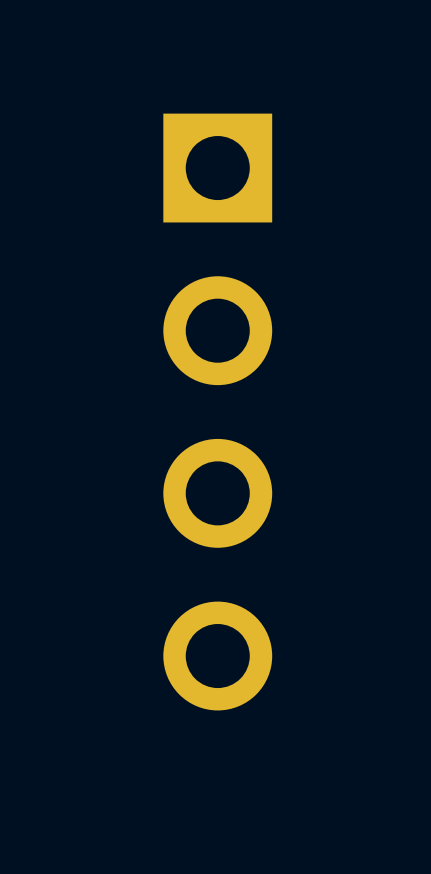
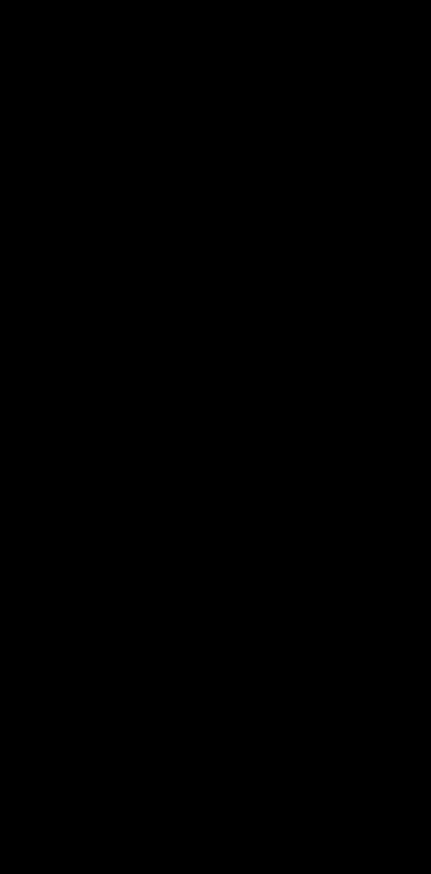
part: (217, 412) -> none

